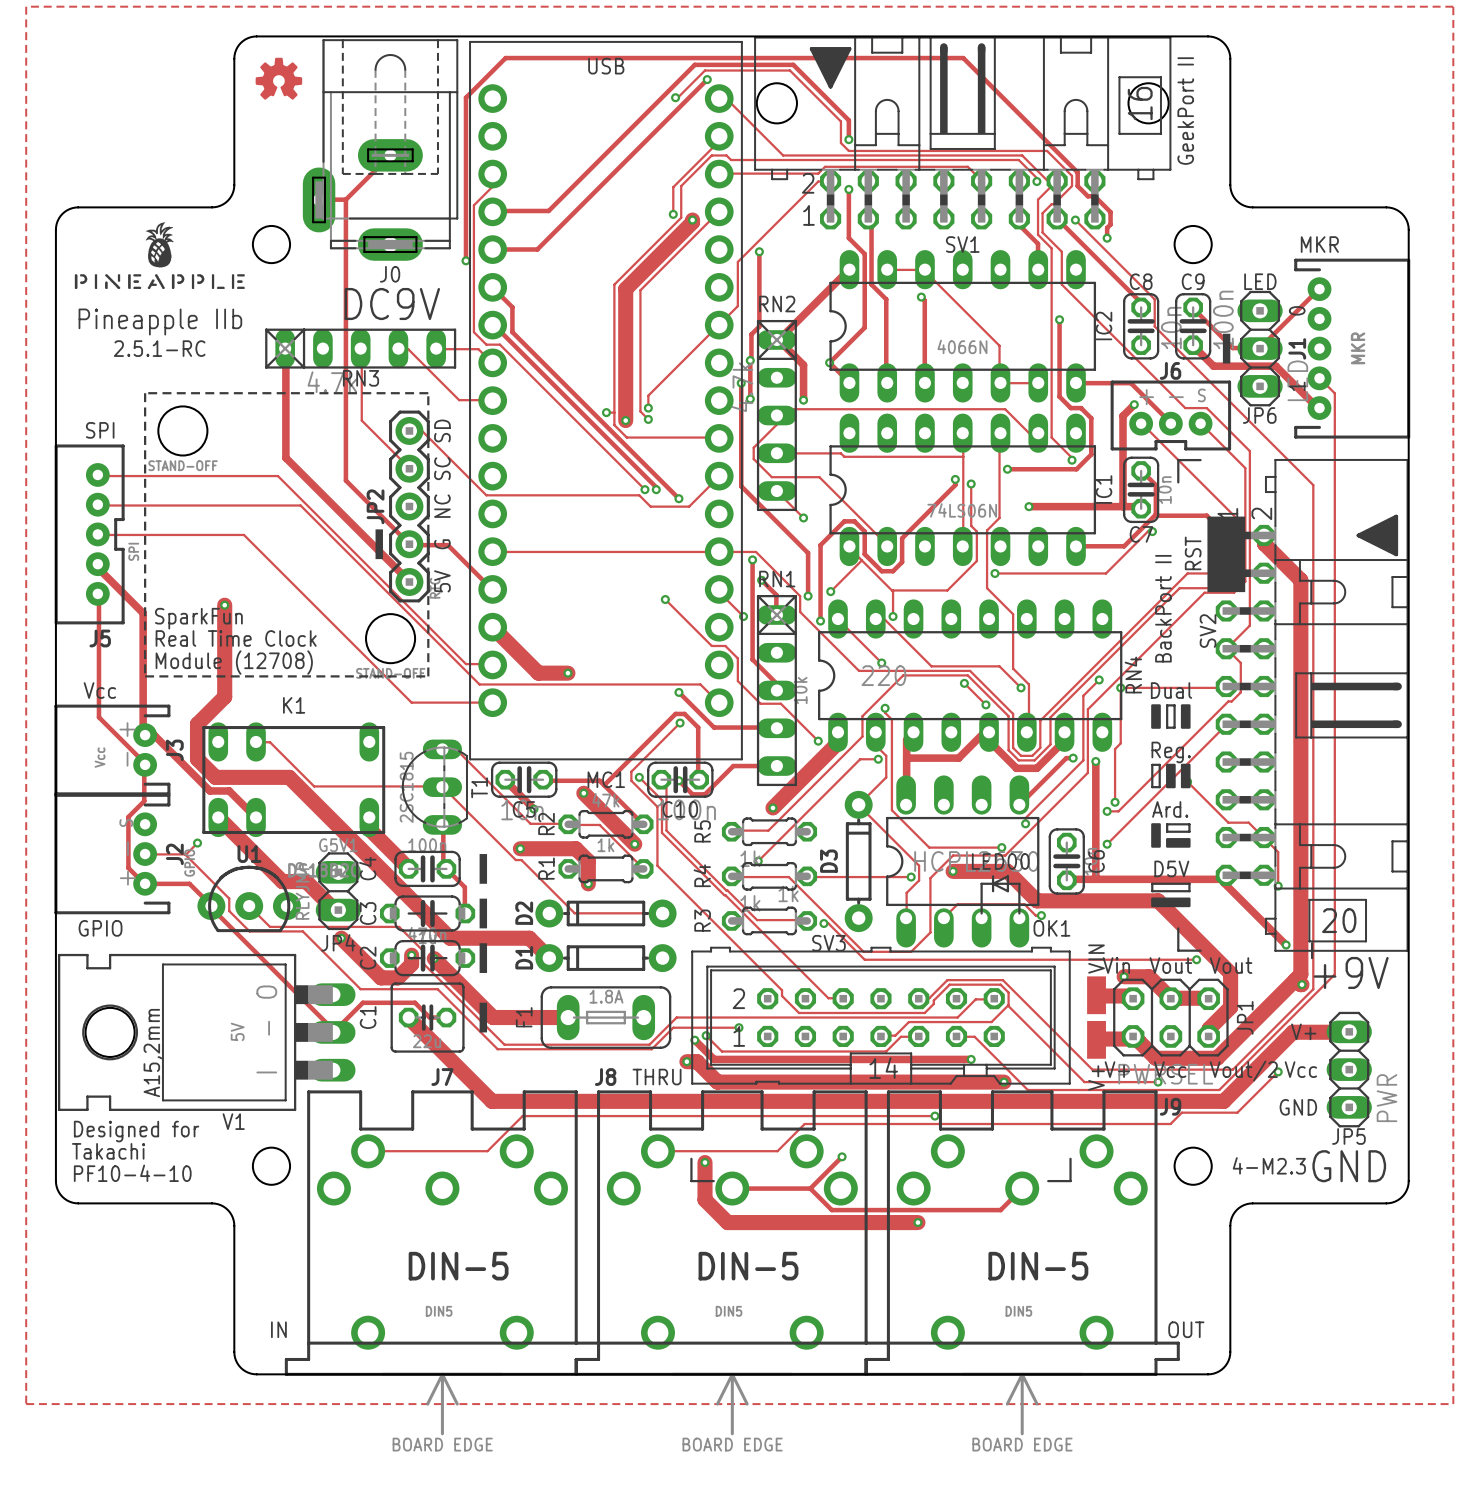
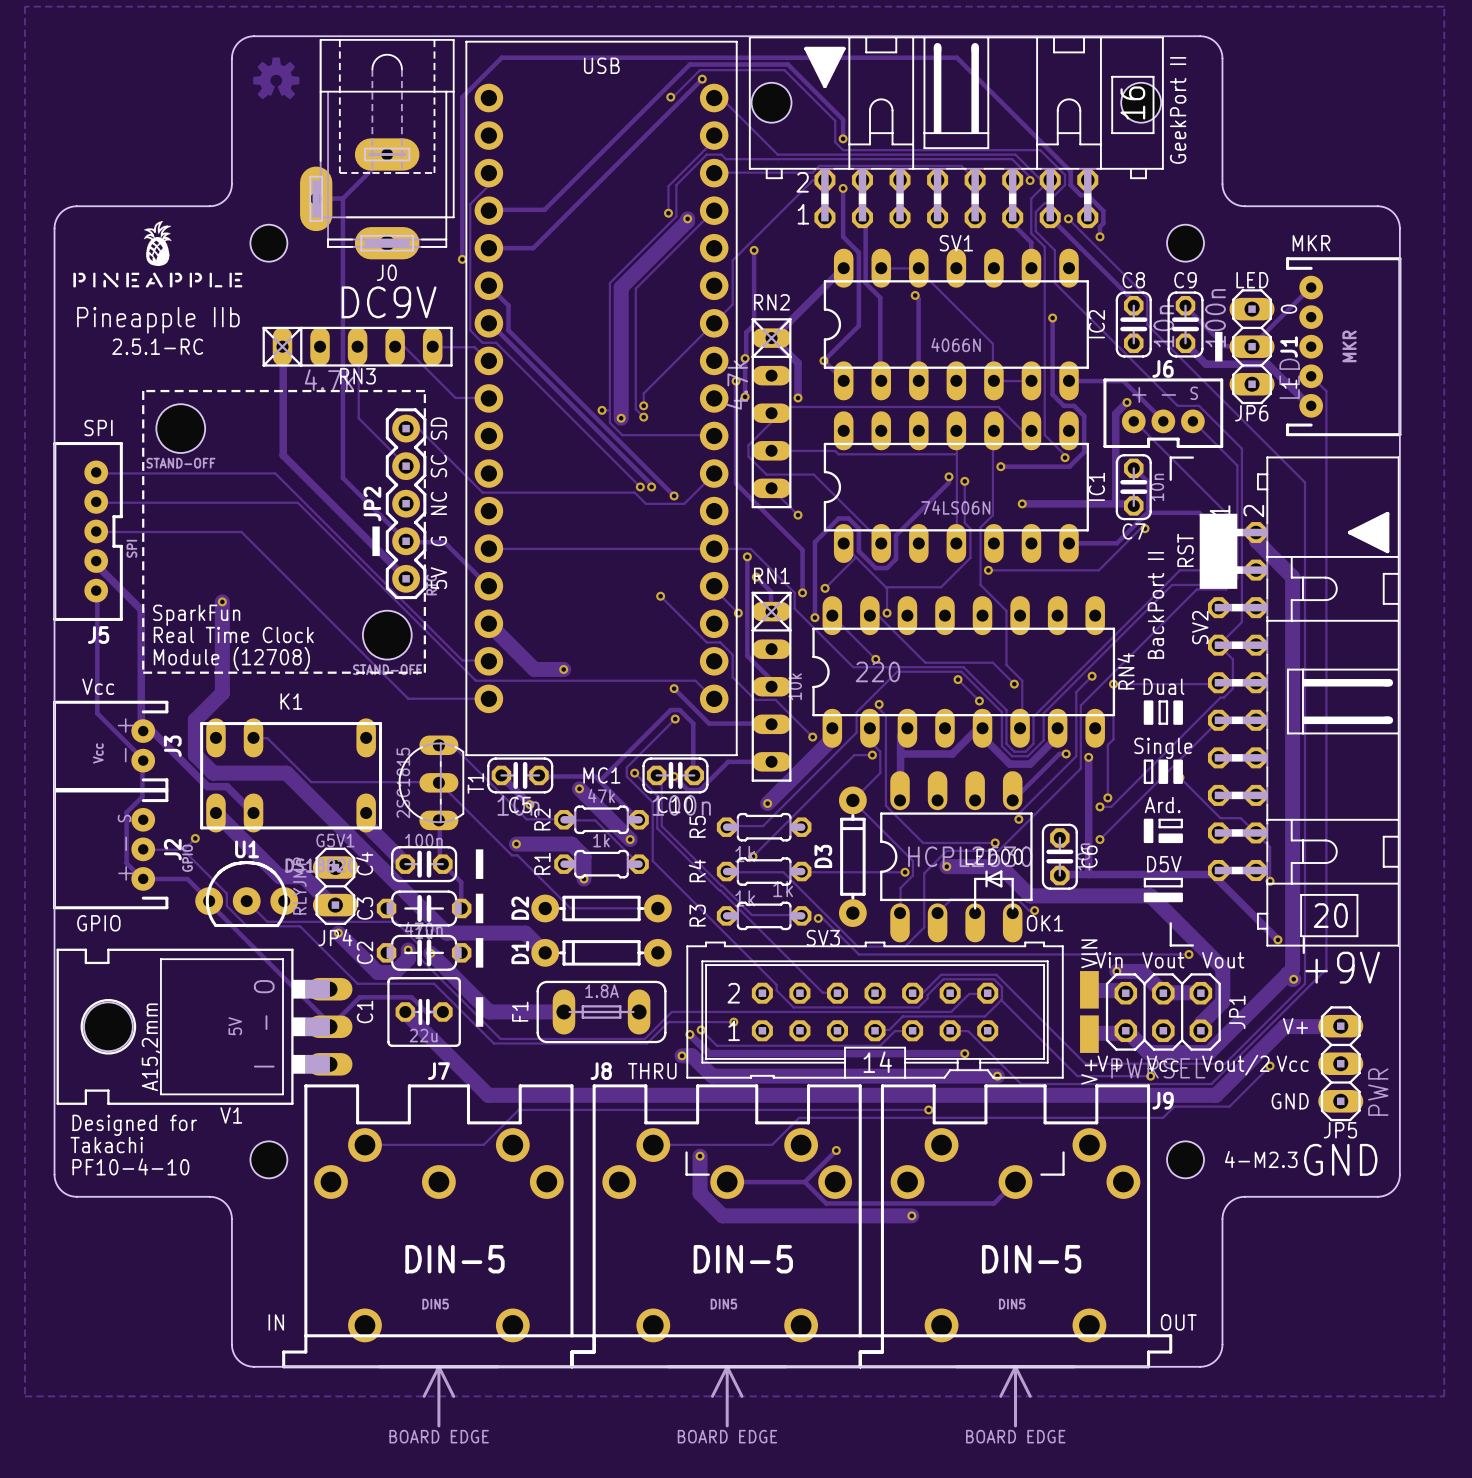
text: Reg. (1171, 752) -> Single (1163, 748)

